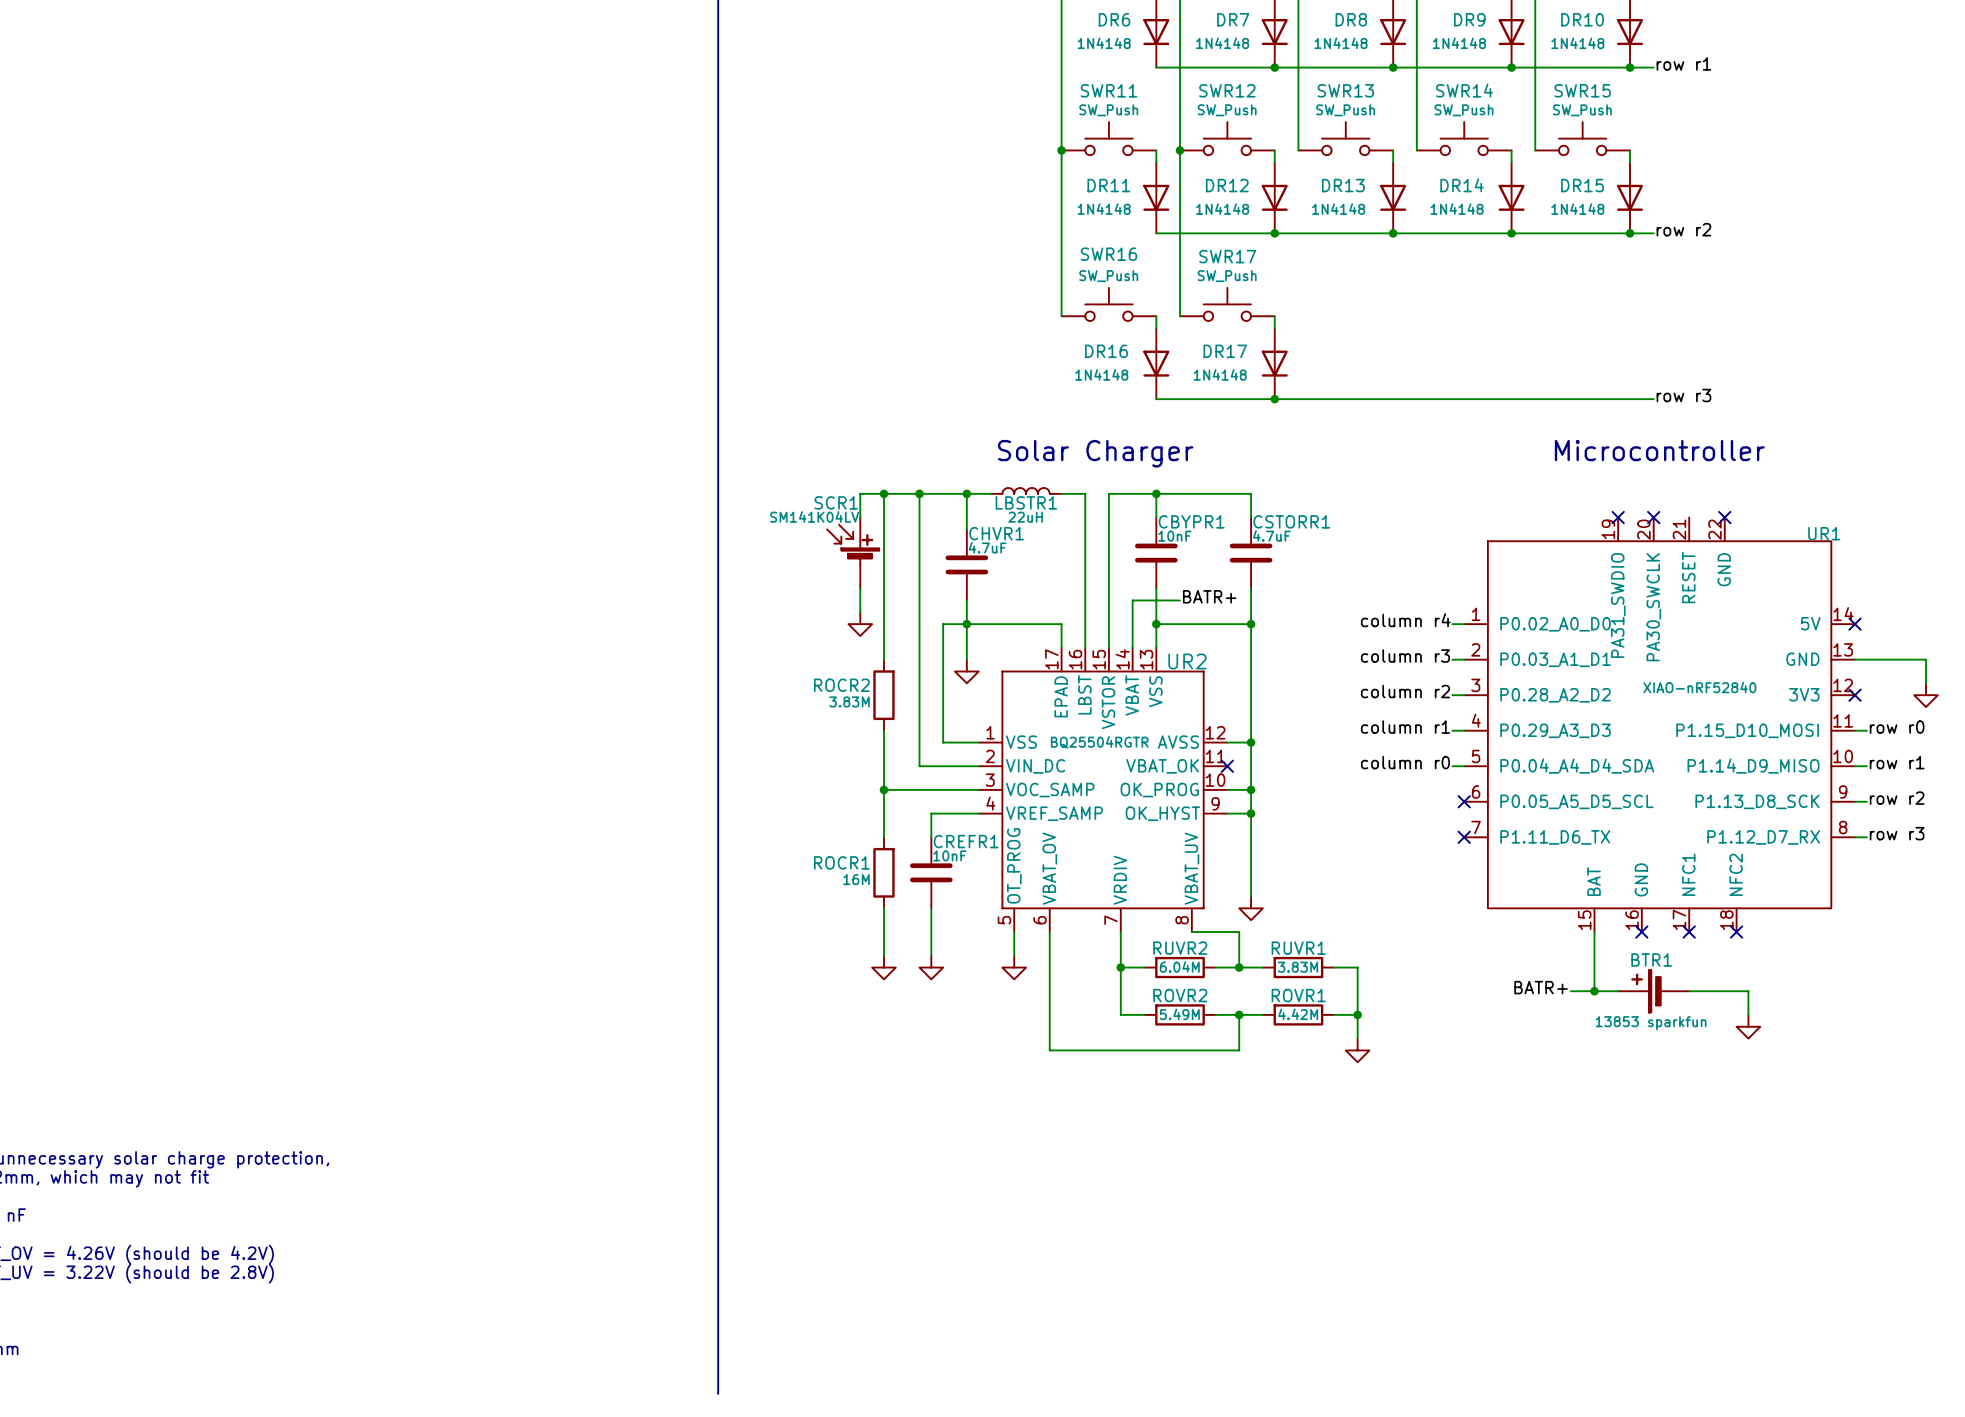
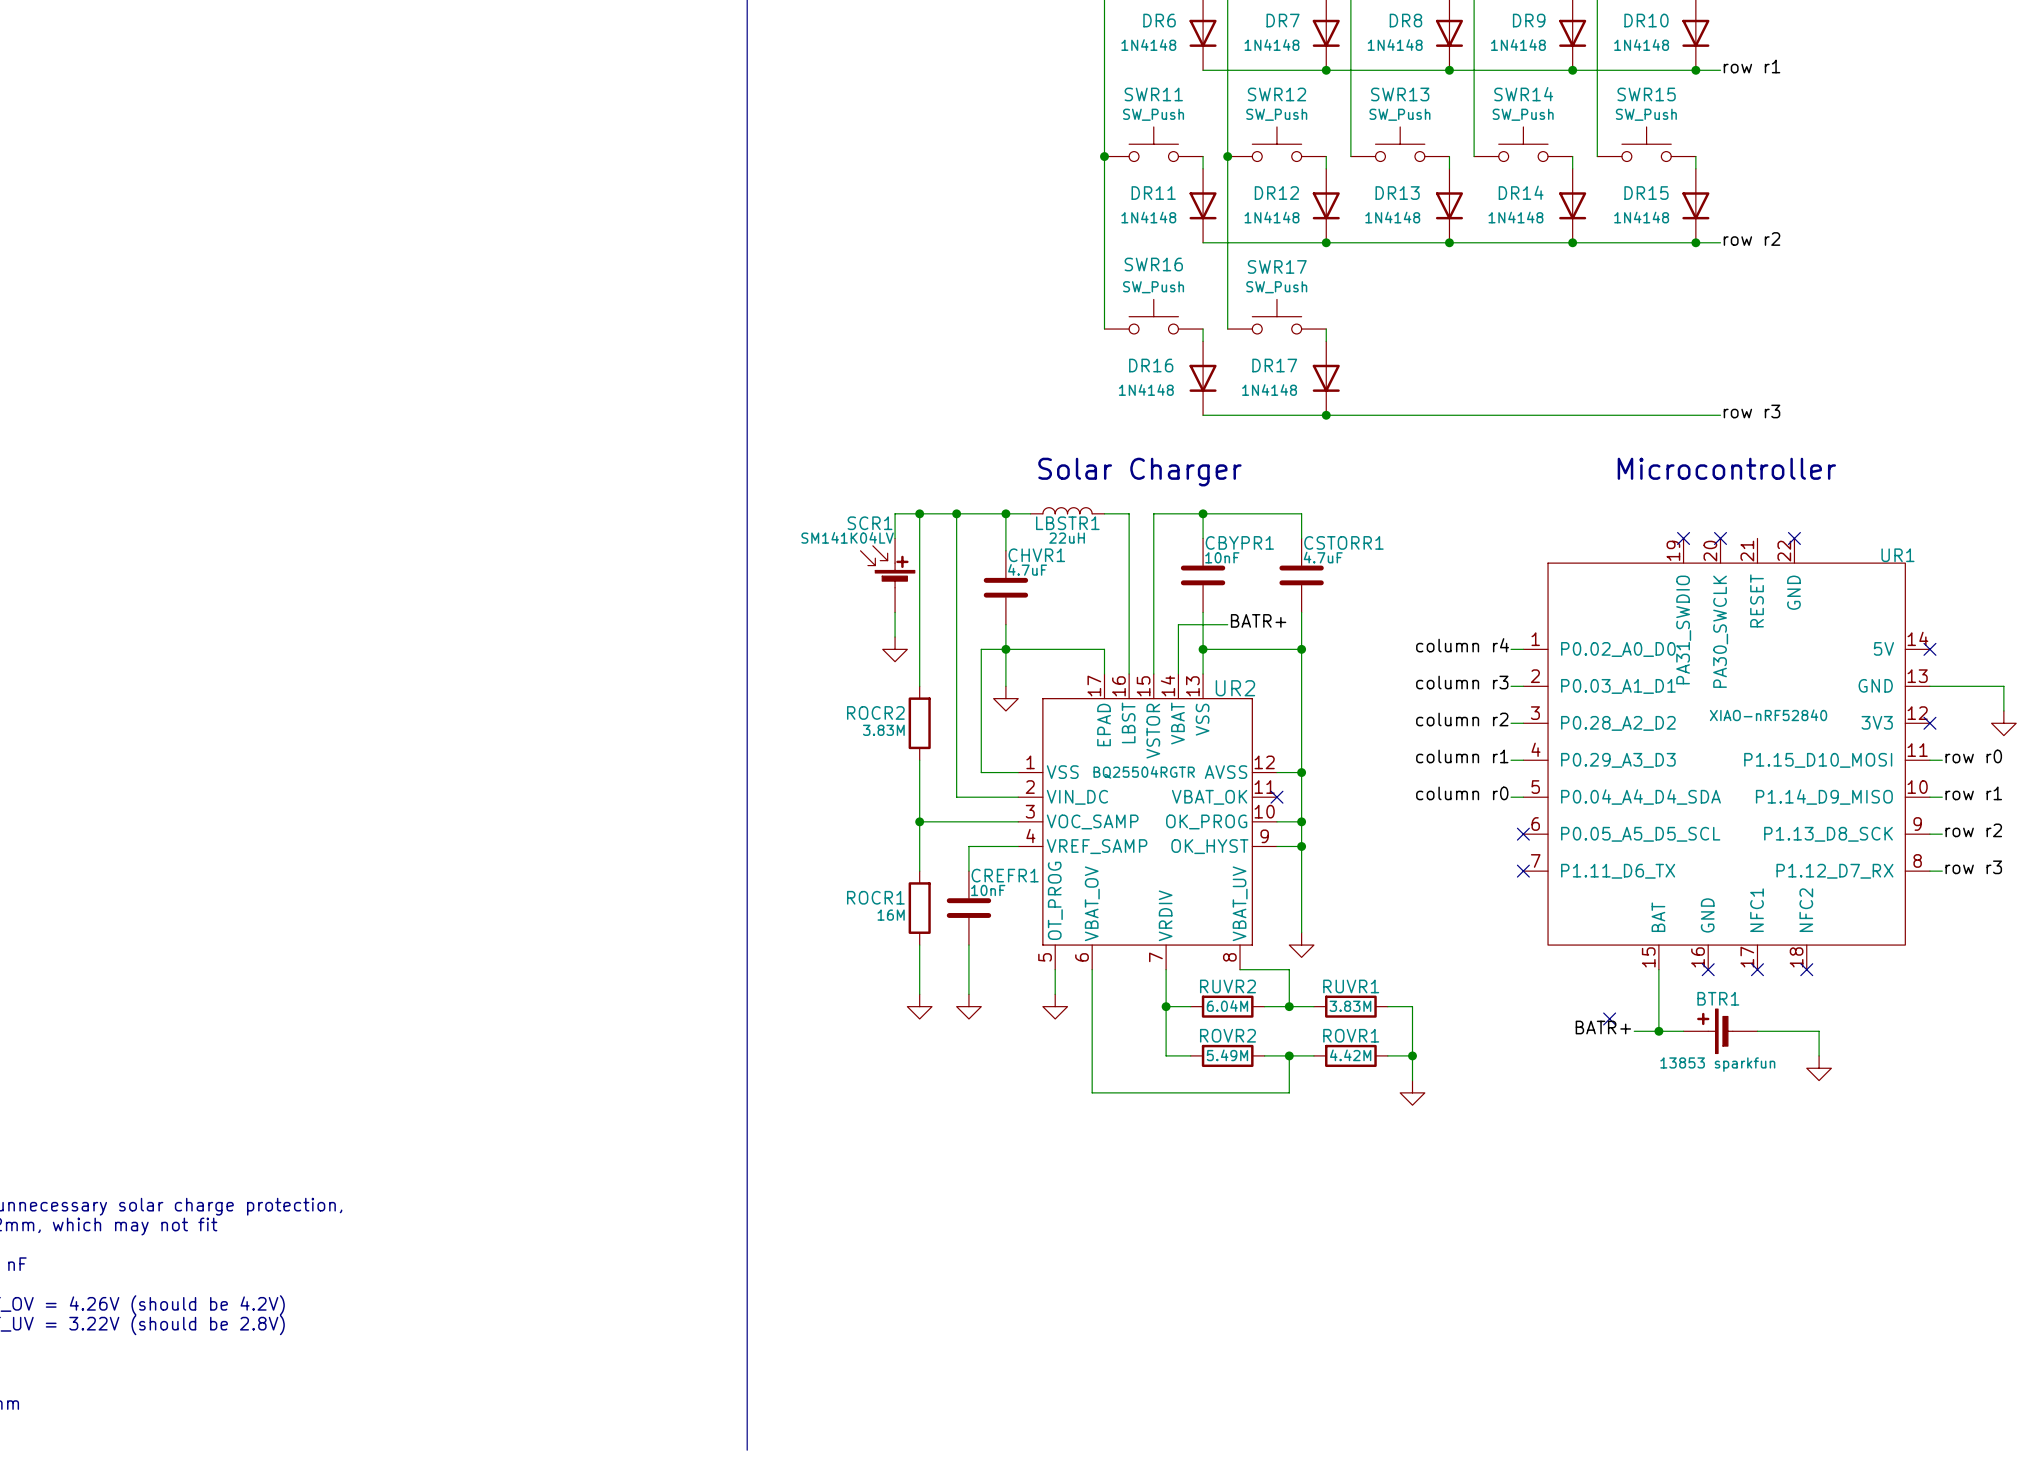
no-connect mark: none -> (1609, 1018)

